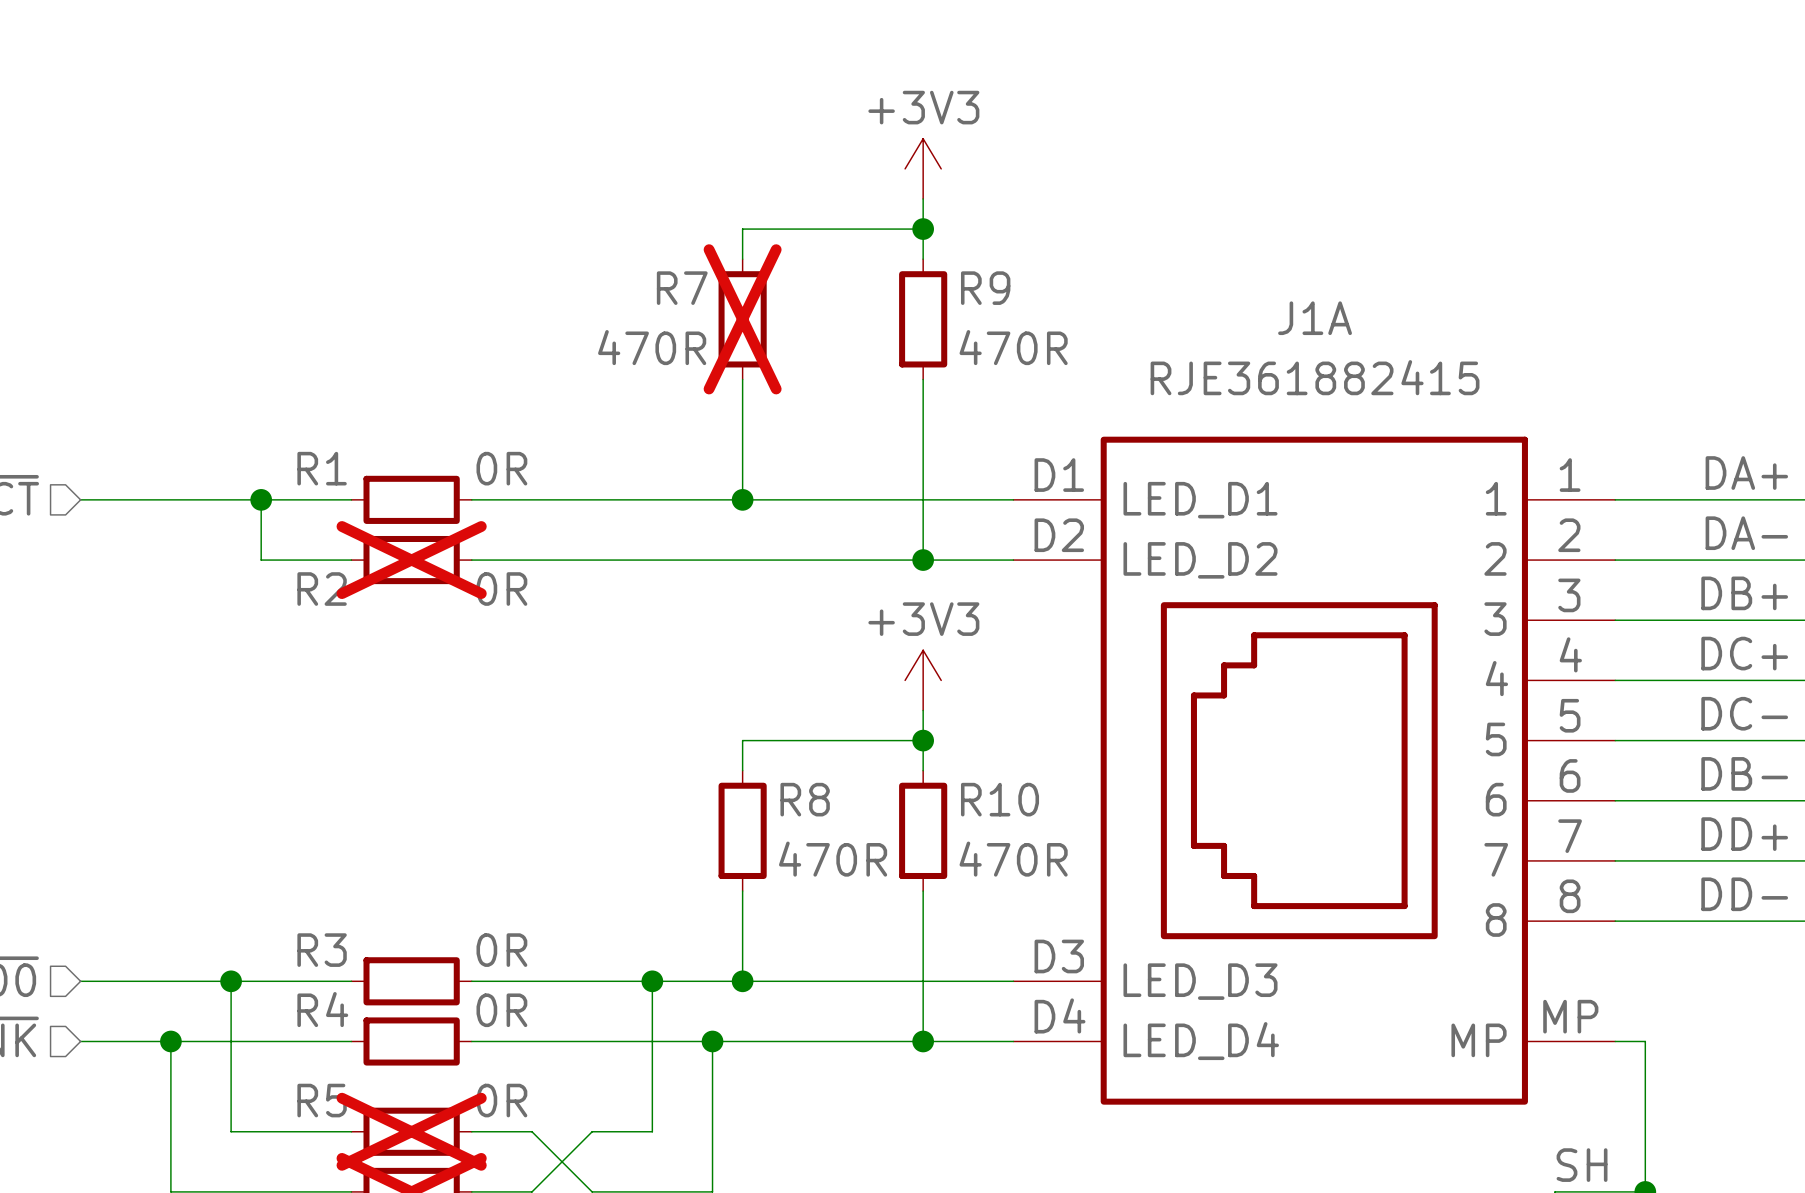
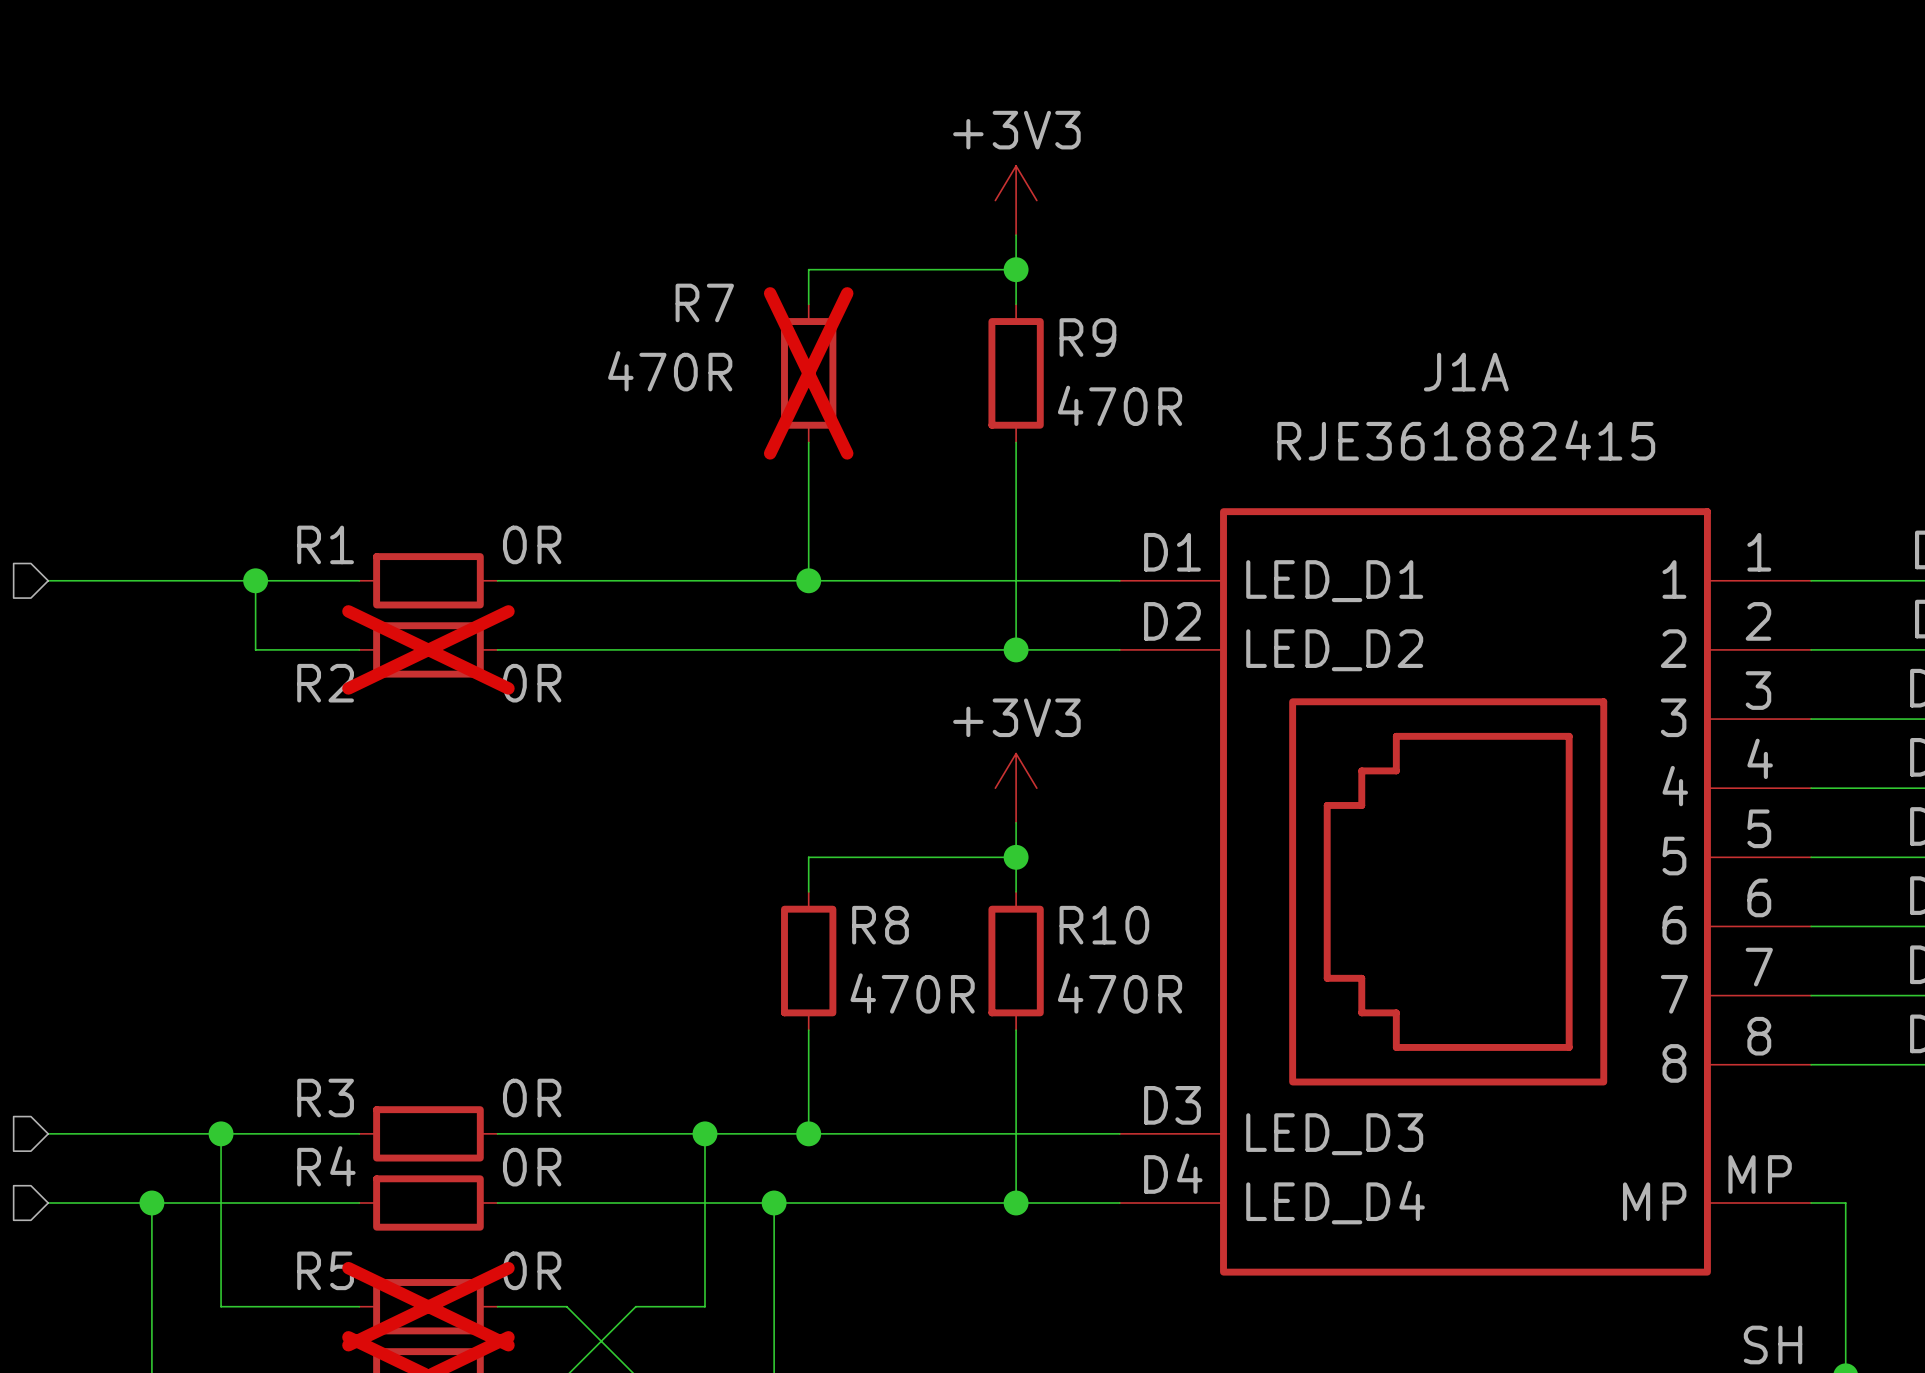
R7 name position: R7 (682, 288) -> R7 (704, 302)
R7 text position: 470R (652, 347) -> 470R (670, 371)

